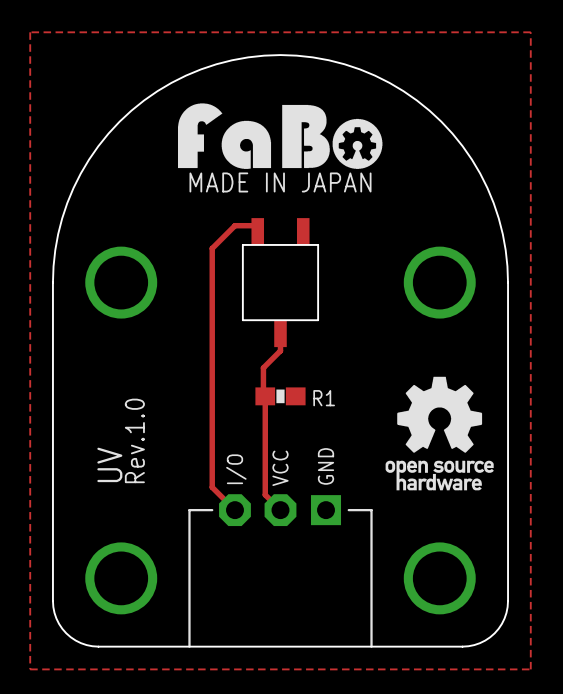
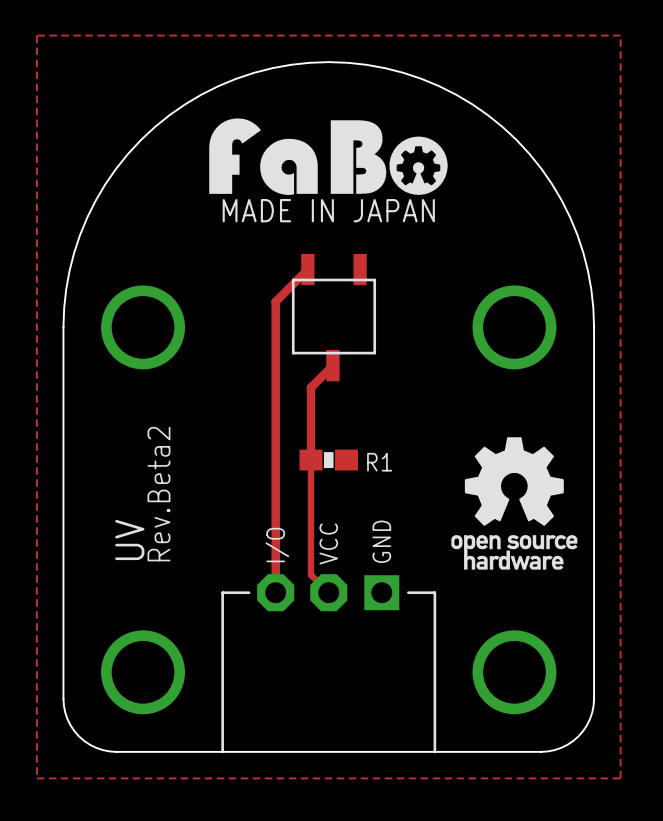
part footprint: [242, 218, 319, 348] -> [291, 253, 377, 382]
track: (257, 231) (257, 225) (234, 225) (212, 248) (212, 487) (234, 510) -> (307, 269) (275, 301) (275, 592)
track: (280, 333) (280, 350) (263, 367) (265, 396) -> (332, 365) (311, 387) (311, 460)
text: Rev.1.0 (134, 440) -> Rev.Beta2 (158, 494)

